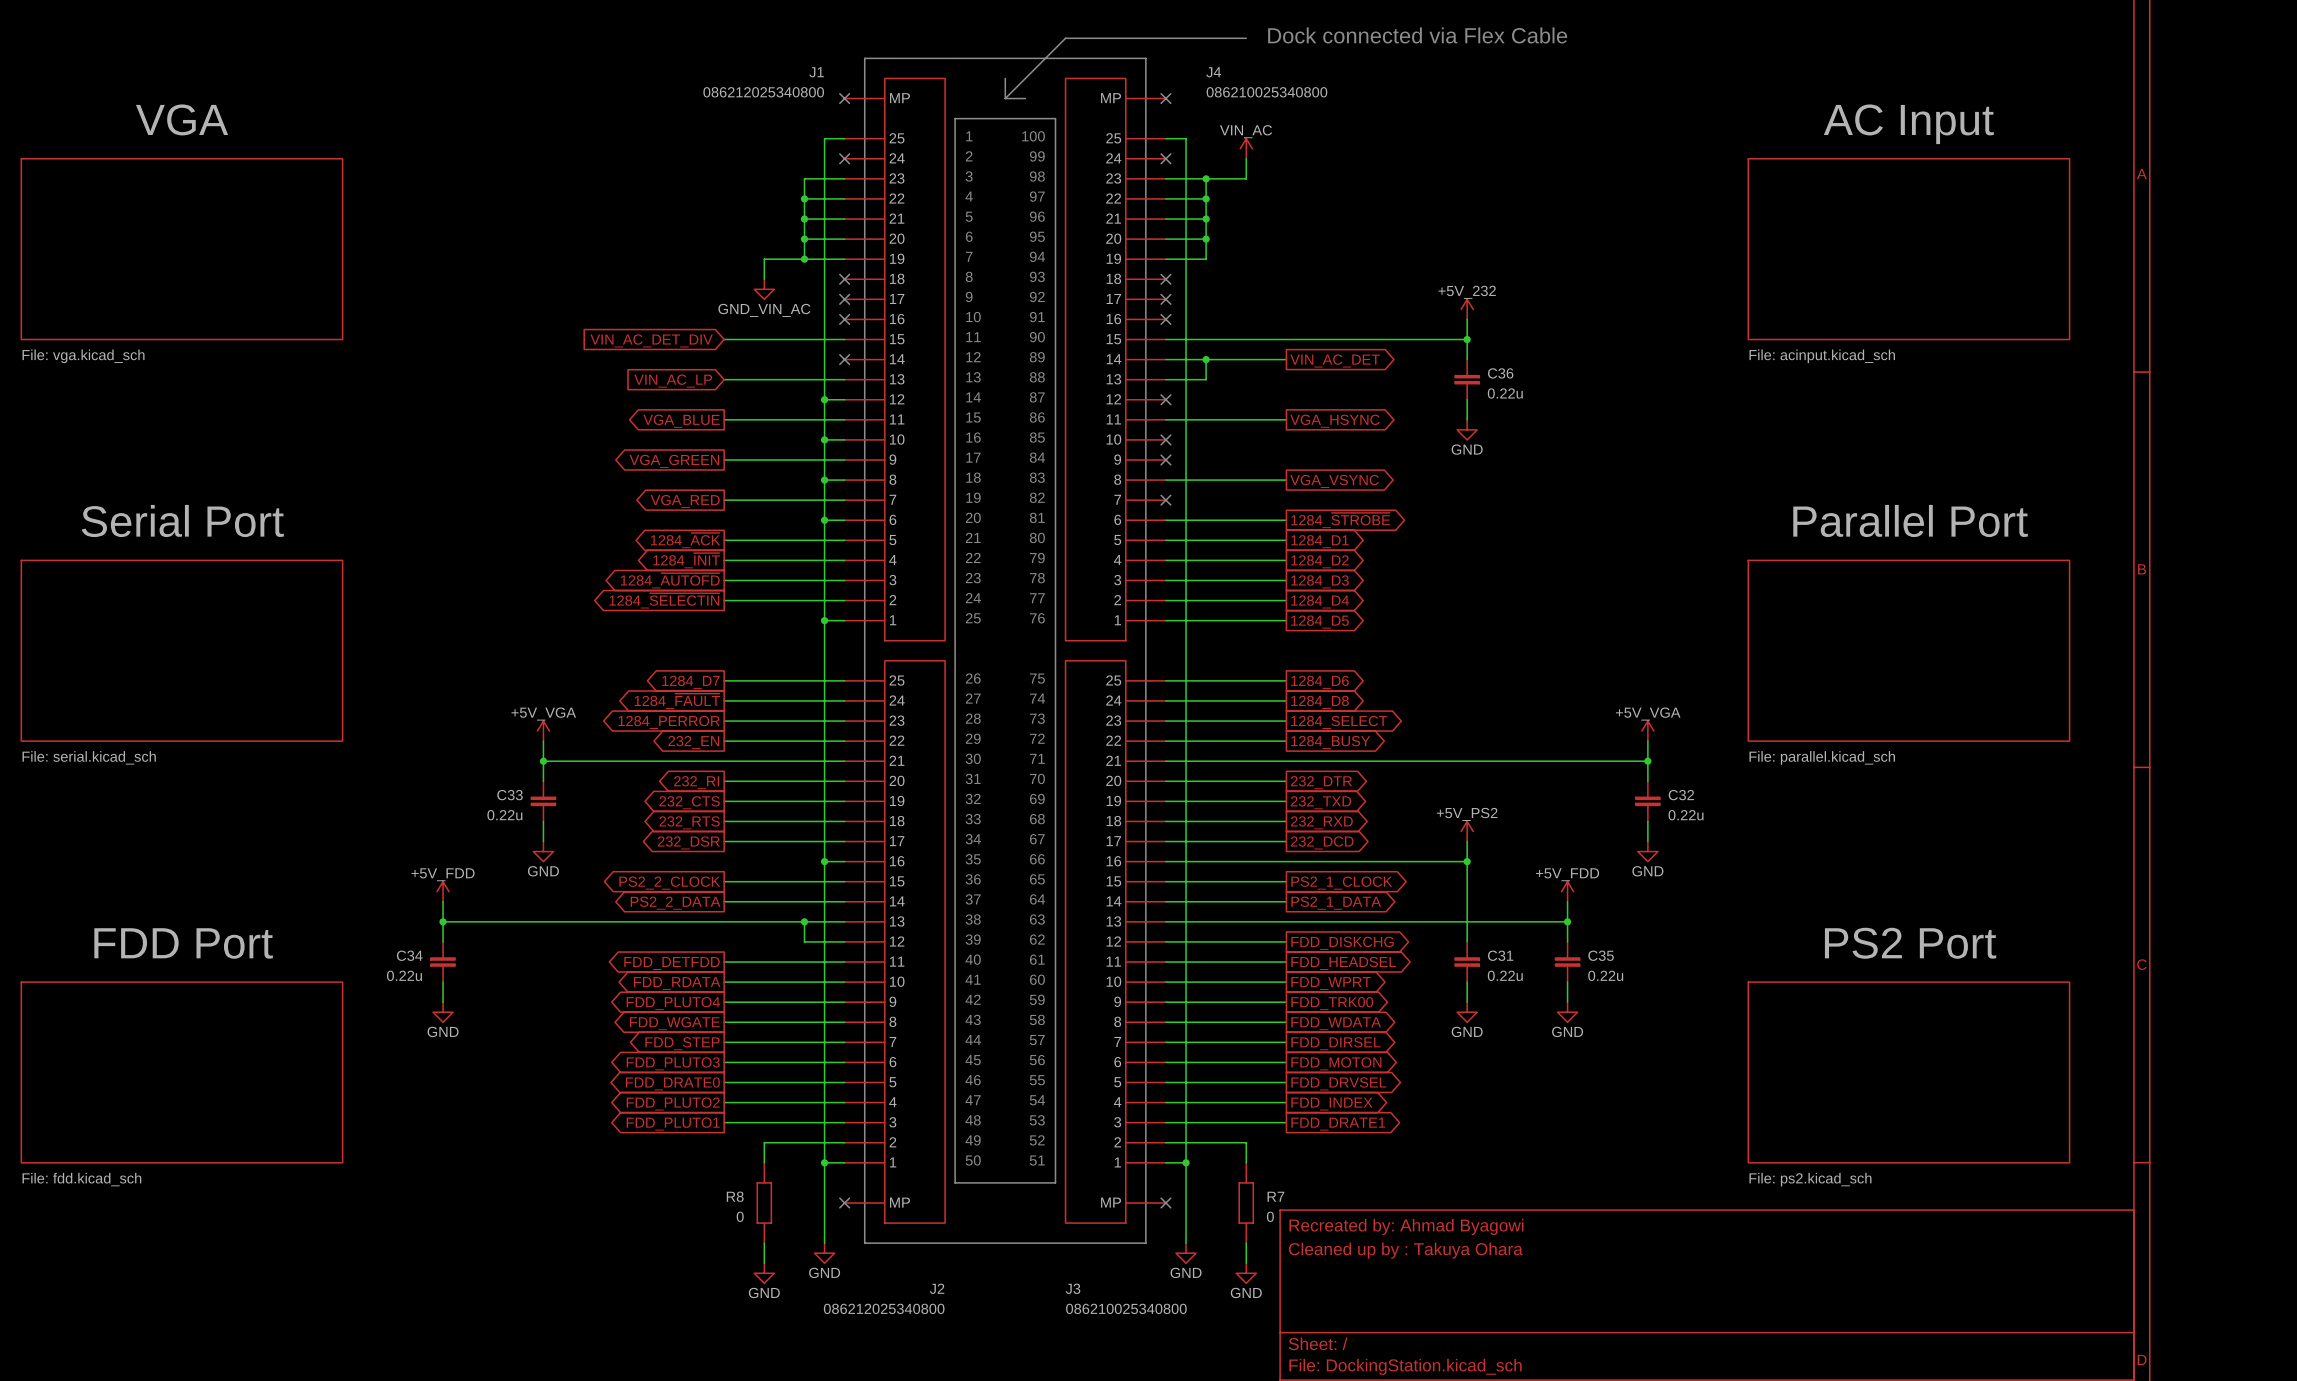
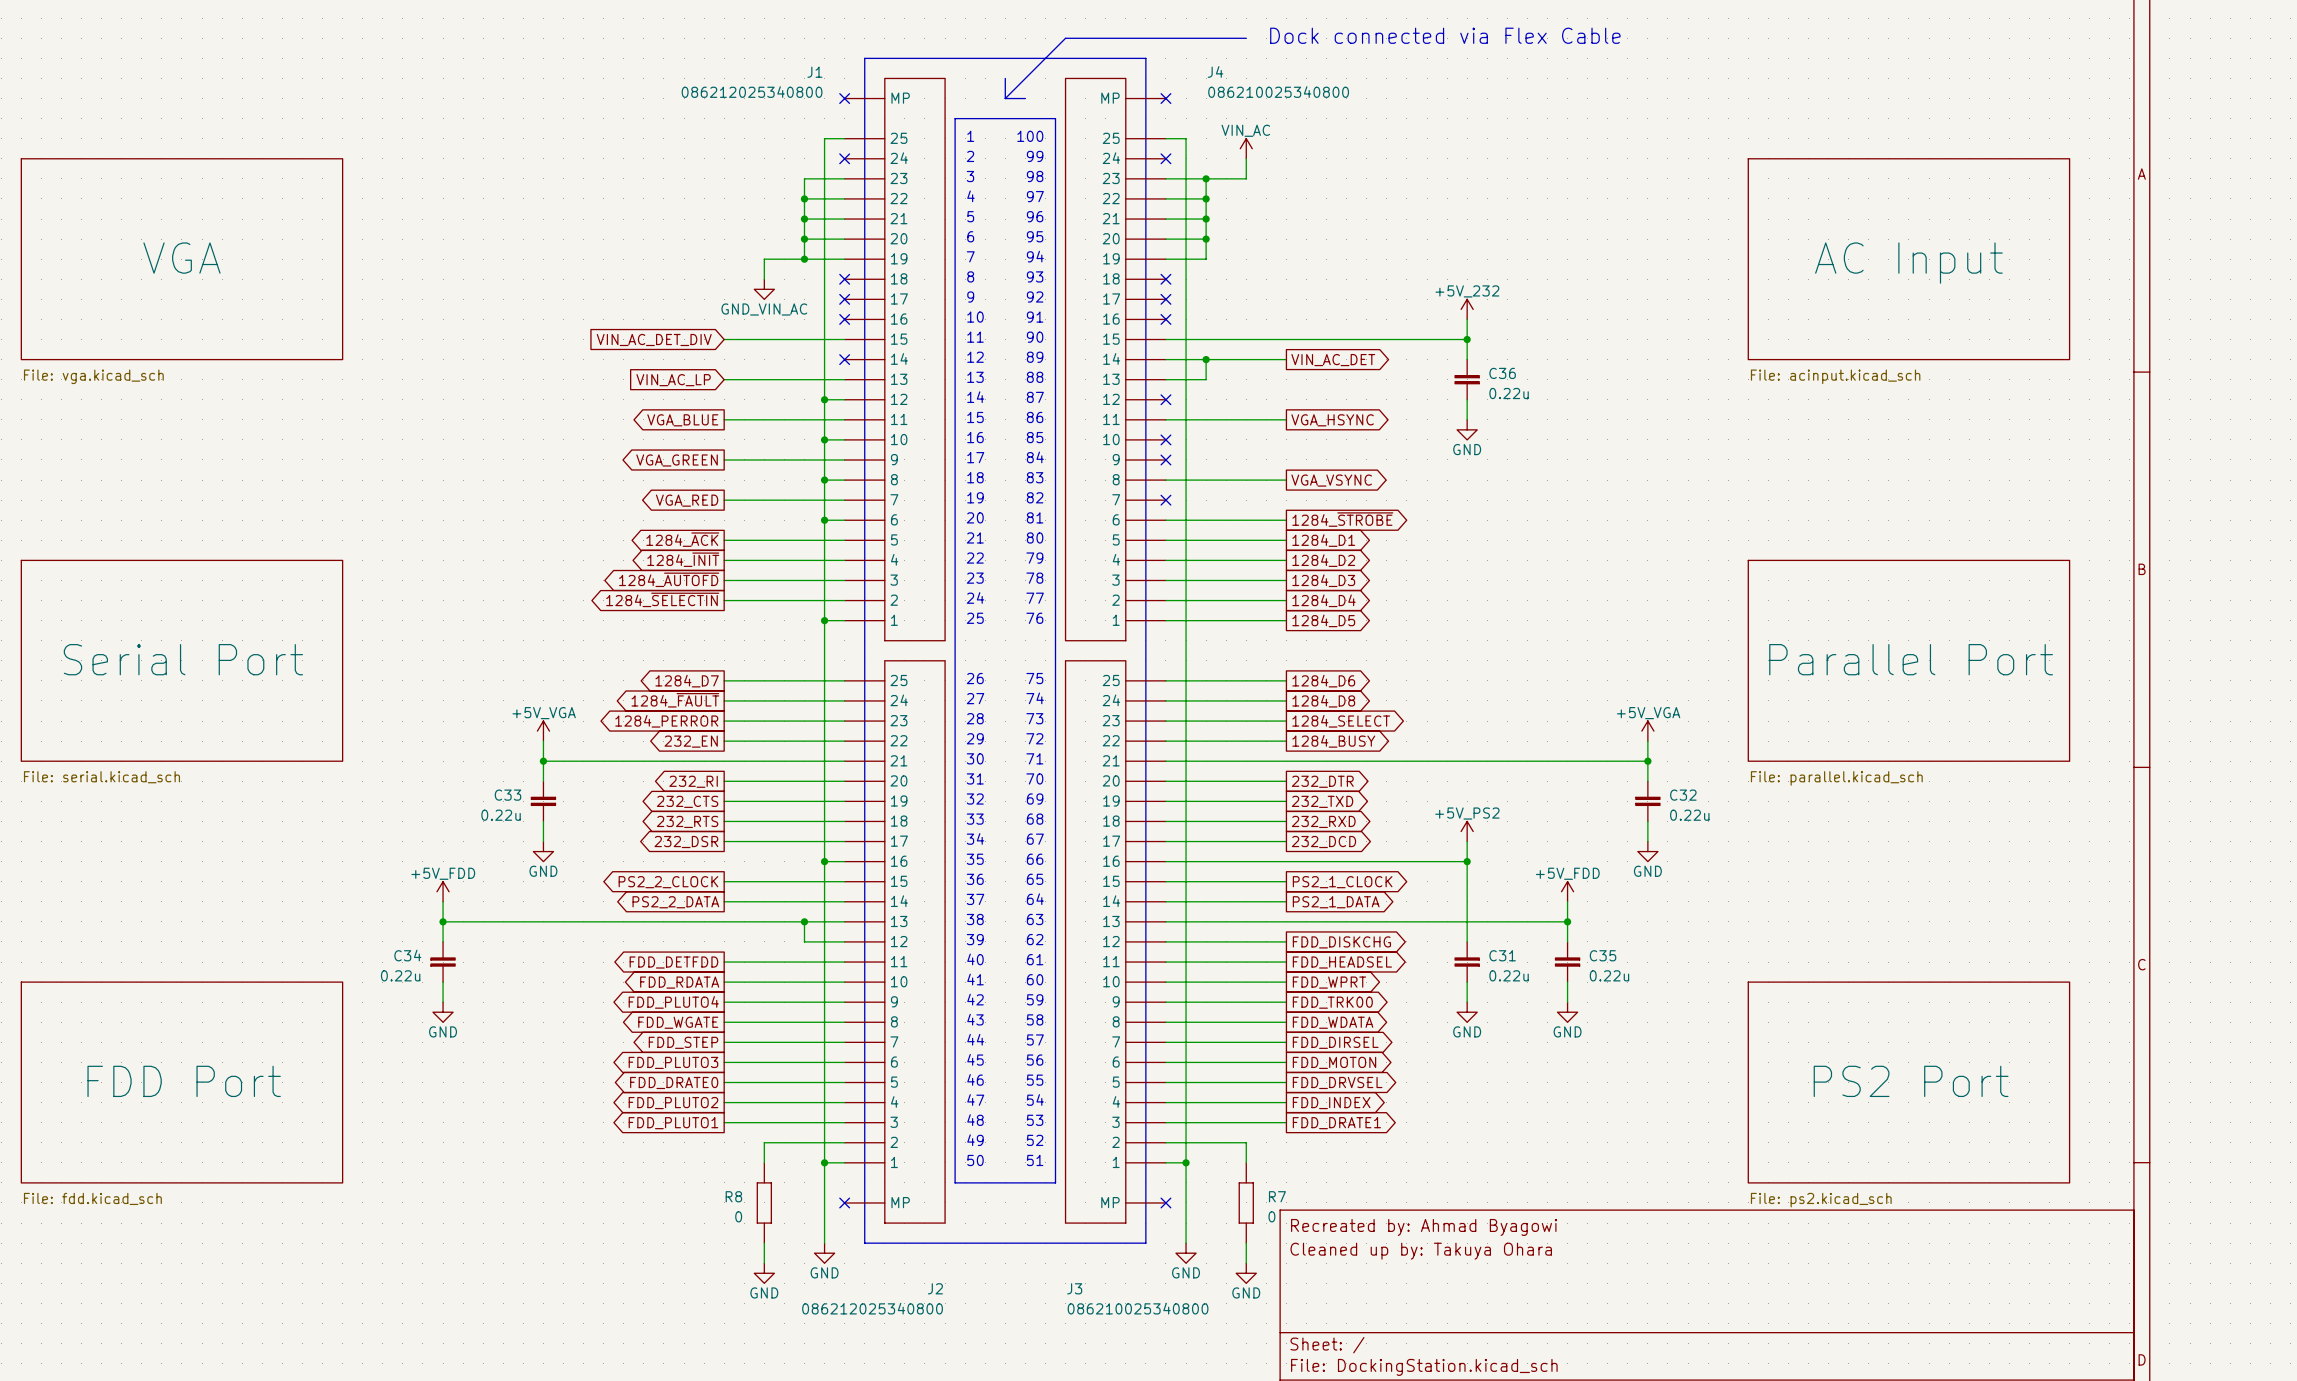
sheet VGA: File: vga.kicad_sch (181, 249) -> none
sheet AC Input: File: acinput.kicad_sch (1908, 249) -> none
sheet VGA: none -> File: vga.kicad_sch (181, 259)
sheet AC Input: none -> File: acinput.kicad_sch (1908, 259)
sheet Serial Port: File: serial.kicad_sch (181, 650) -> none
sheet Parallel Port: File: parallel.kicad_sch (1908, 650) -> none
sheet Serial Port: none -> File: serial.kicad_sch (181, 660)
sheet Parallel Port: none -> File: parallel.kicad_sch (1908, 660)
sheet PS2 Port name position: PS2 Port (1910, 943) -> PS2 Port (1911, 1081)
sheet PS2 Port shape: [1747, 981, 2071, 1164] -> [1747, 981, 2071, 1184]
sheet FDD Port: File: fdd.kicad_sch (181, 1072) -> none
sheet FDD Port: none -> File: fdd.kicad_sch (181, 1082)
title block: Cleaned up by : Takuya Ohara (1405, 1250) -> Cleaned up by: Takuya Ohara (1421, 1251)

